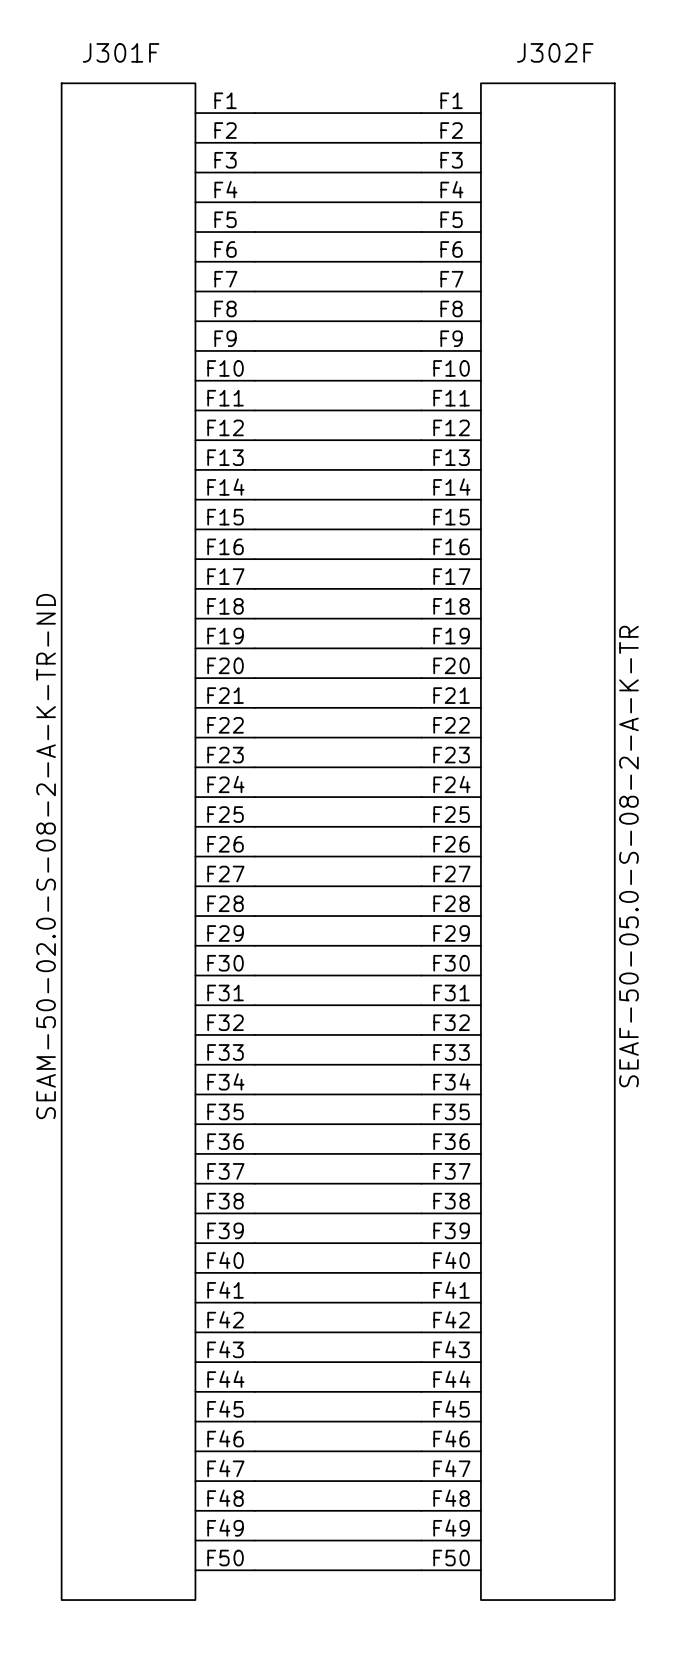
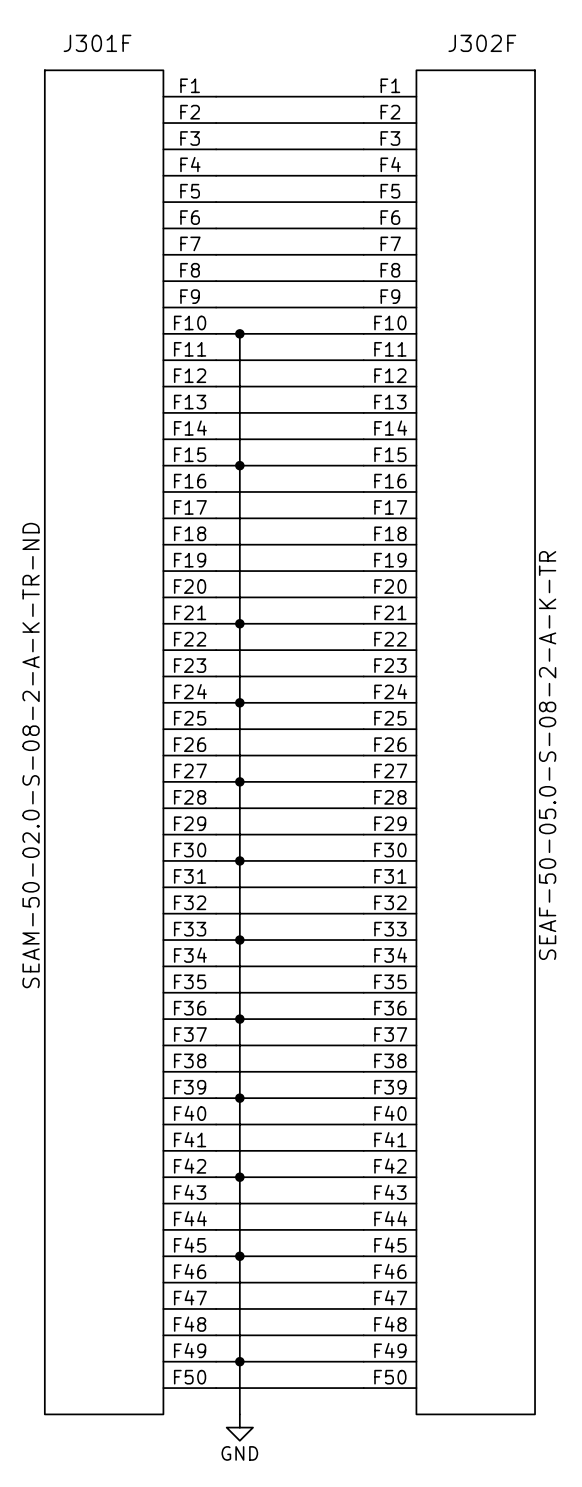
wire: none -> (239, 333) (239, 1414)
junction: none -> (239, 333)
junction: none -> (239, 465)
junction: none -> (239, 623)
junction: none -> (239, 702)
junction: none -> (239, 781)
junction: none -> (239, 860)
junction: none -> (239, 940)
junction: none -> (239, 1019)
junction: none -> (239, 1098)
junction: none -> (239, 1177)
junction: none -> (239, 1256)
junction: none -> (239, 1361)
power symbol: none -> GND (239, 1427)

